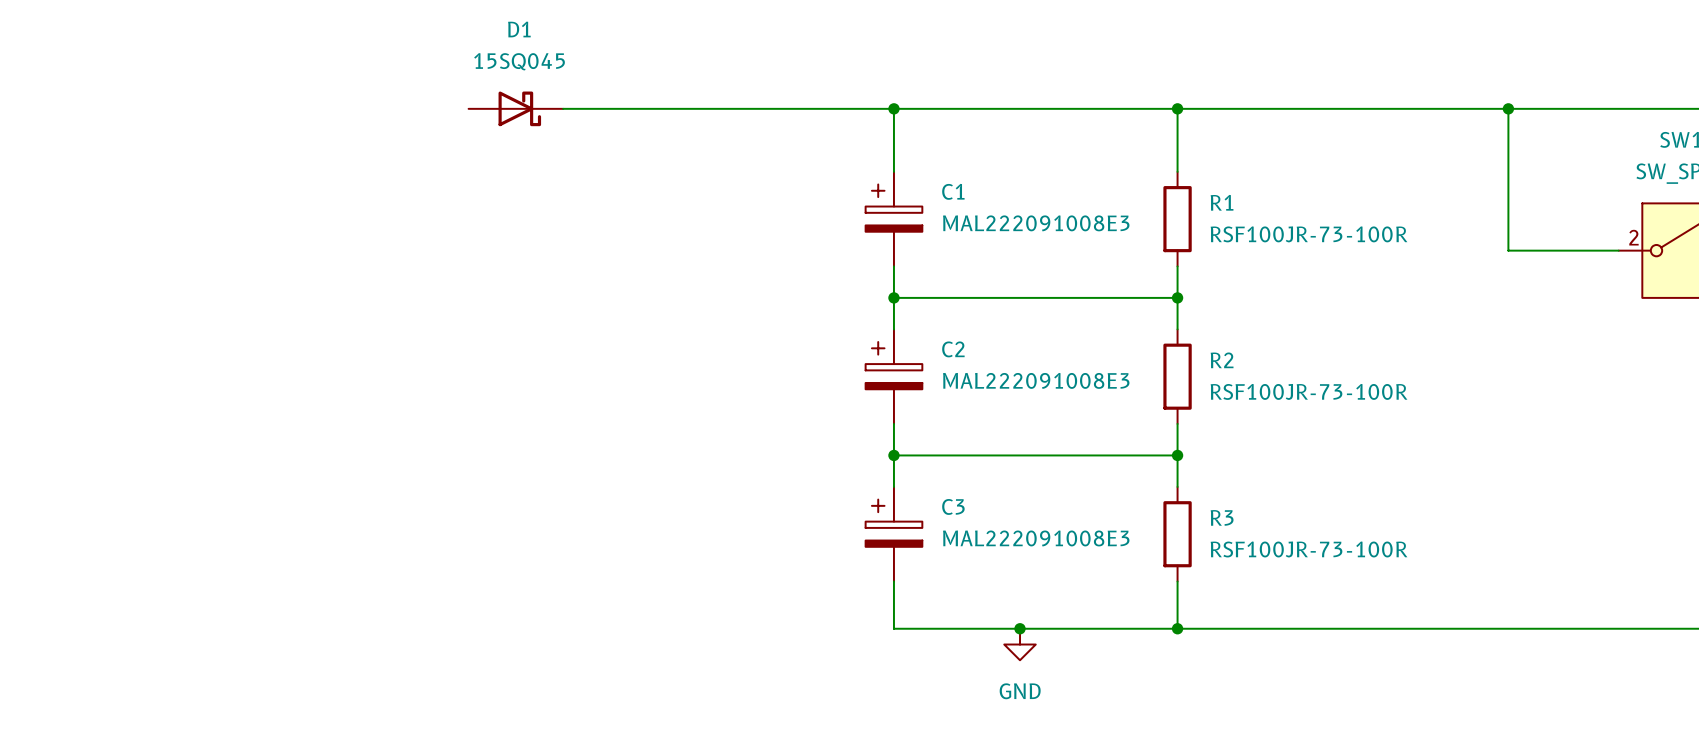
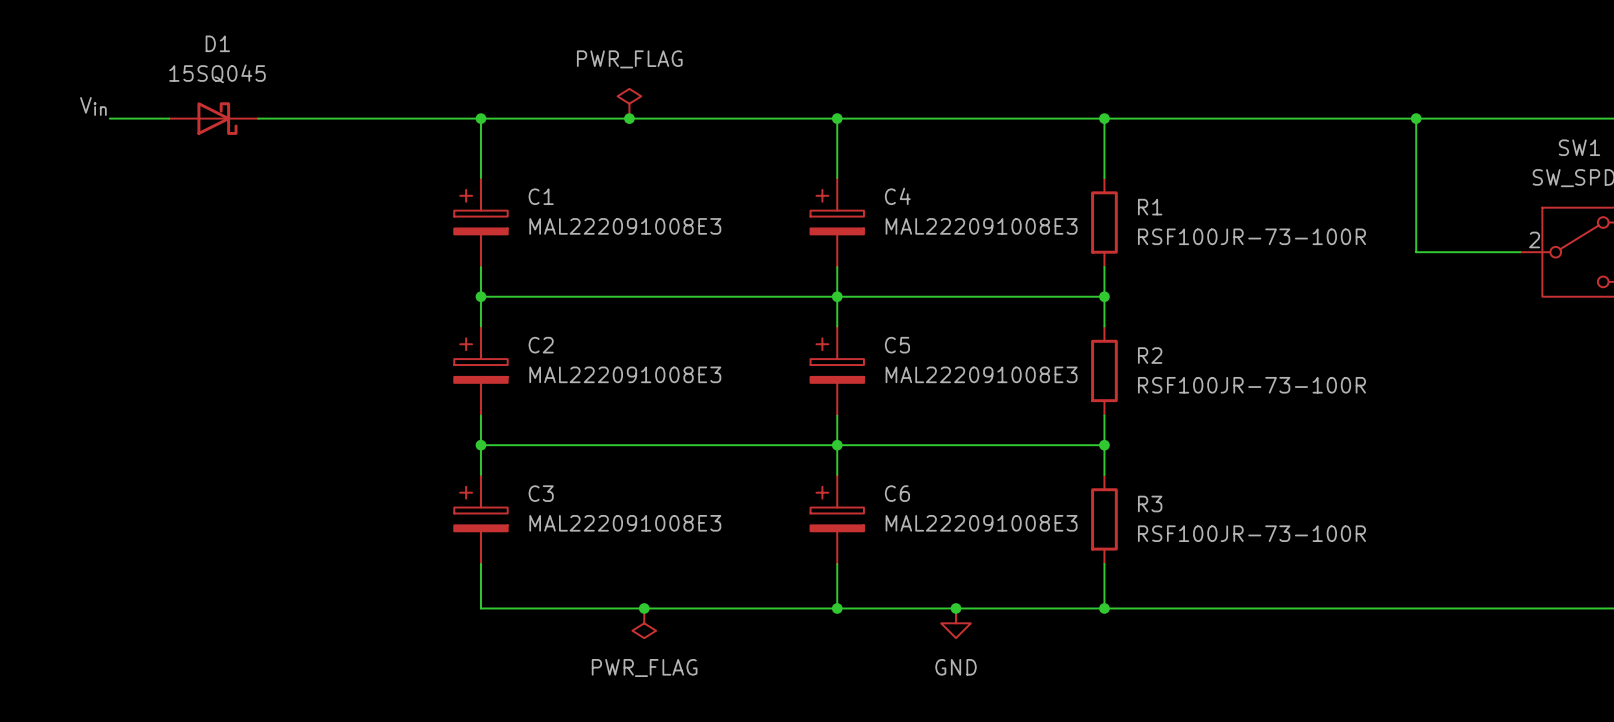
power symbol: none -> PWR_FLAG (629, 103)
label: none -> Vin (93, 106)
wire: none -> (109, 118) (169, 118)
wire: none -> (258, 118) (525, 118)
wire: none -> (480, 118) (480, 177)
D1 position: (515, 108) -> (213, 118)
junction: none -> (480, 118)
junction: none -> (629, 118)
C1 name: C1 (953, 191) -> C4 (897, 196)
C1: none -> MAL222091008E3 (480, 222)
wire: none -> (480, 267) (480, 326)
wire: none -> (480, 296) (837, 296)
junction: none -> (480, 296)
C2 name: C2 (953, 349) -> C5 (897, 345)
C2: none -> MAL222091008E3 (480, 370)
wire: none -> (480, 415) (480, 474)
wire: none -> (480, 445) (837, 445)
junction: none -> (480, 445)
C3 name: C3 (953, 506) -> C6 (897, 493)
C3: none -> MAL222091008E3 (480, 519)
wire: none -> (480, 563) (480, 608) (837, 608)
junction: none -> (644, 608)
junction: none -> (837, 608)
power symbol: none -> PWR_FLAG (644, 623)

